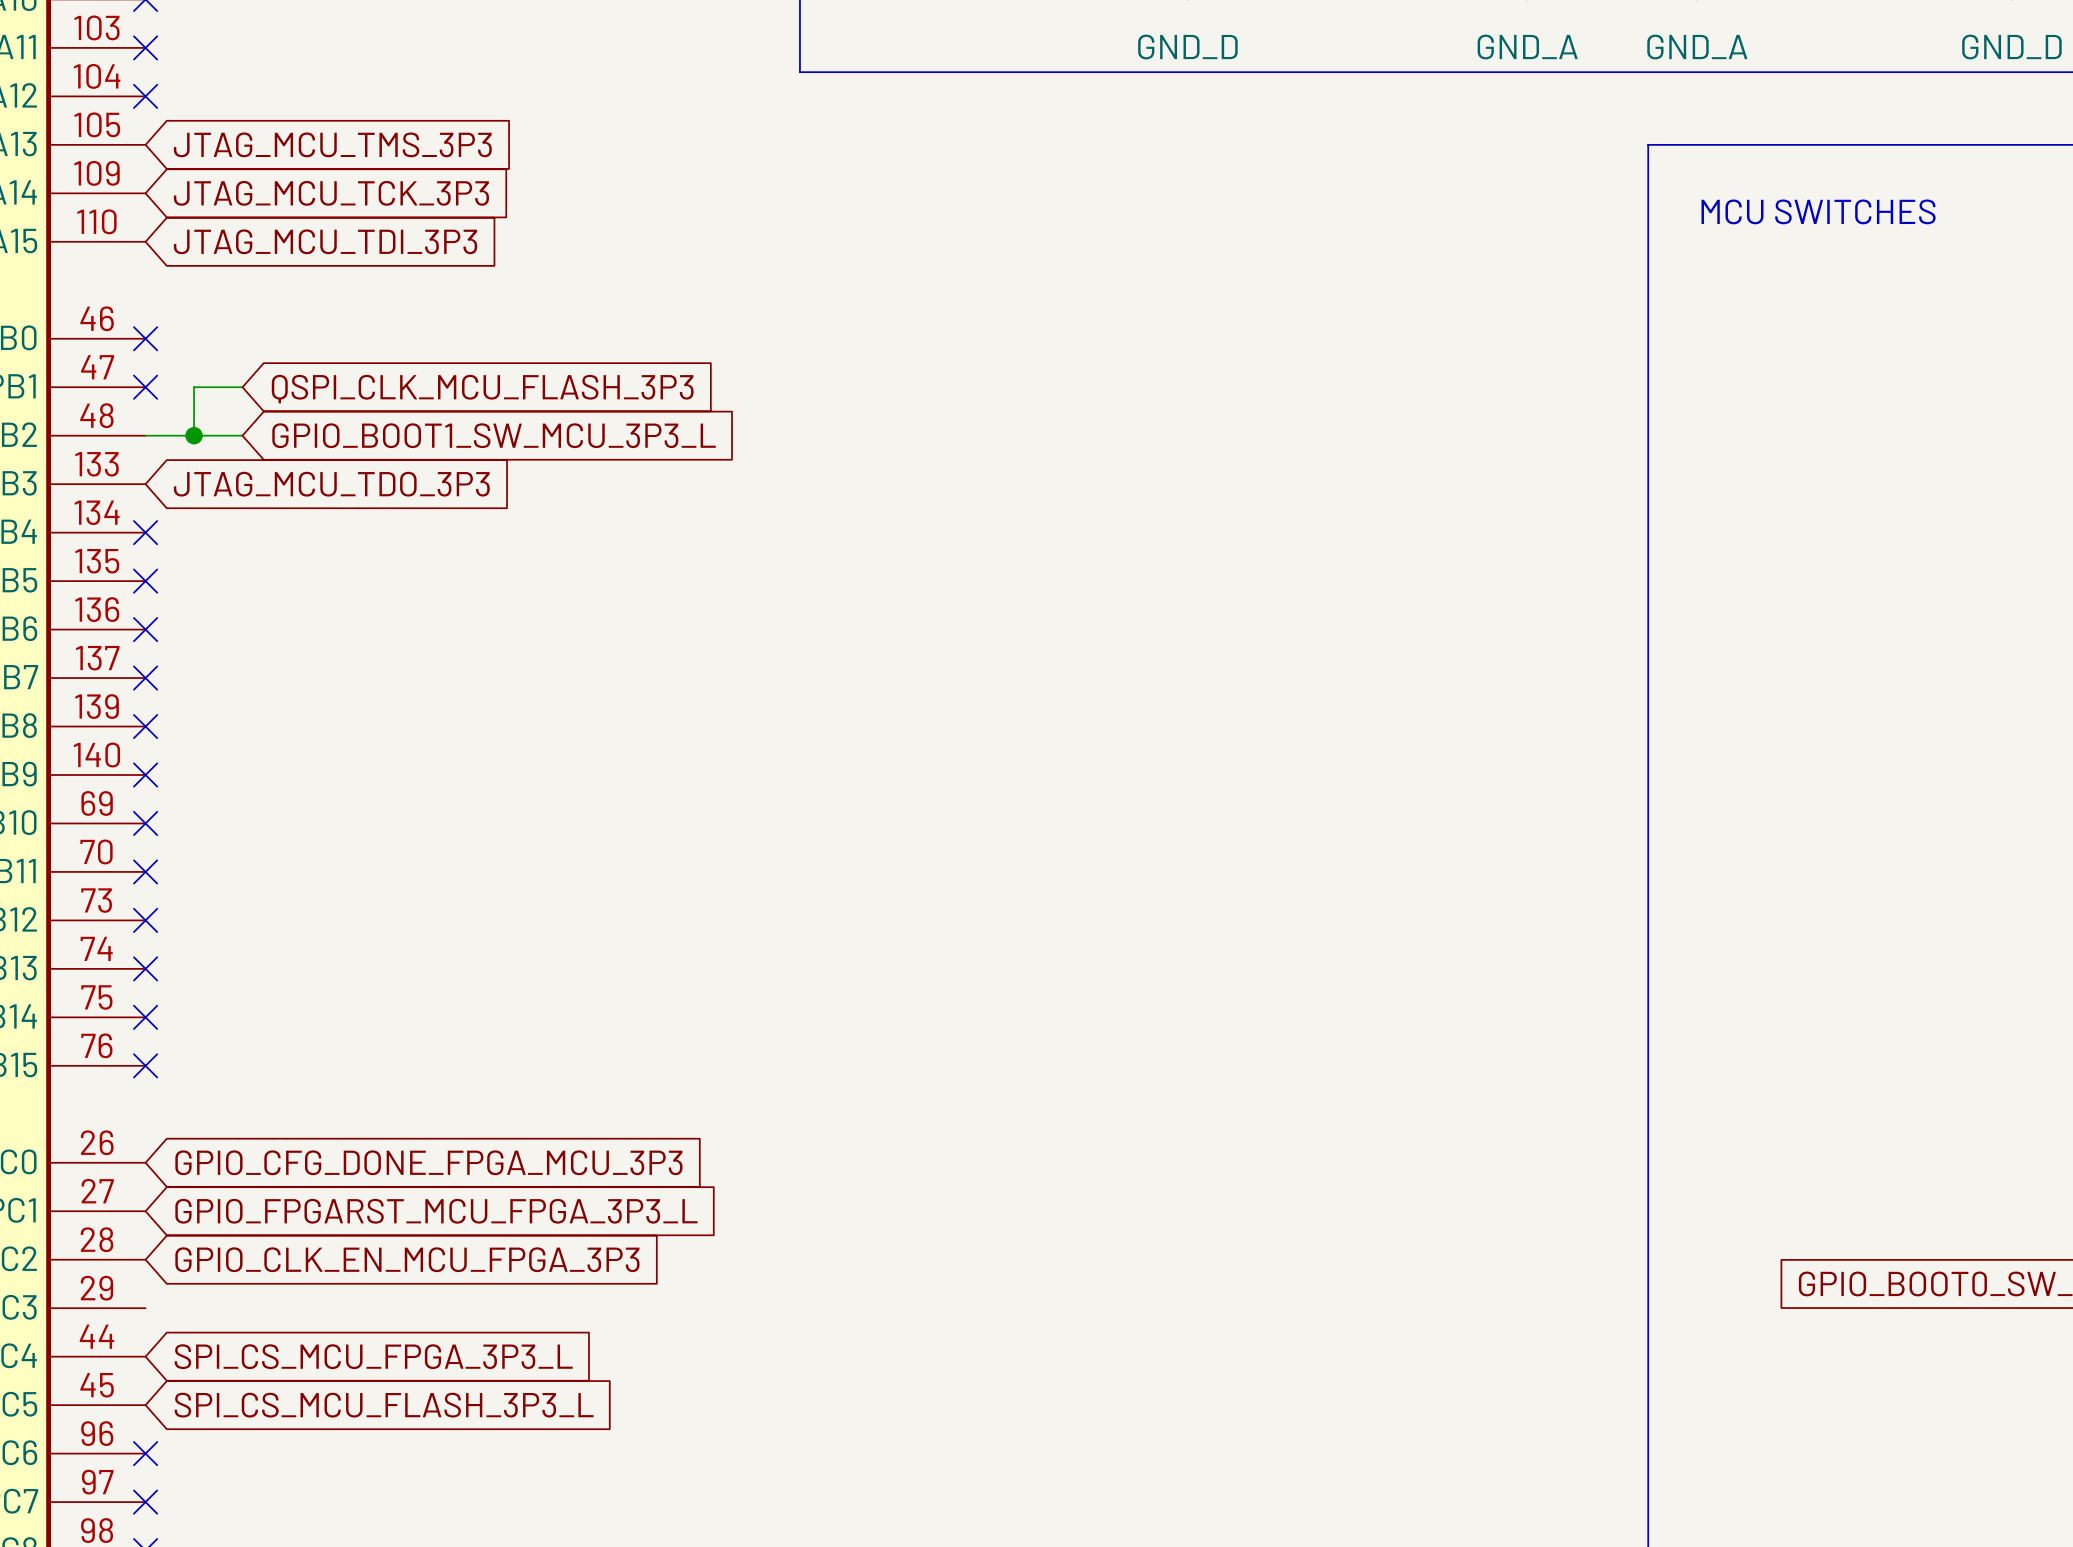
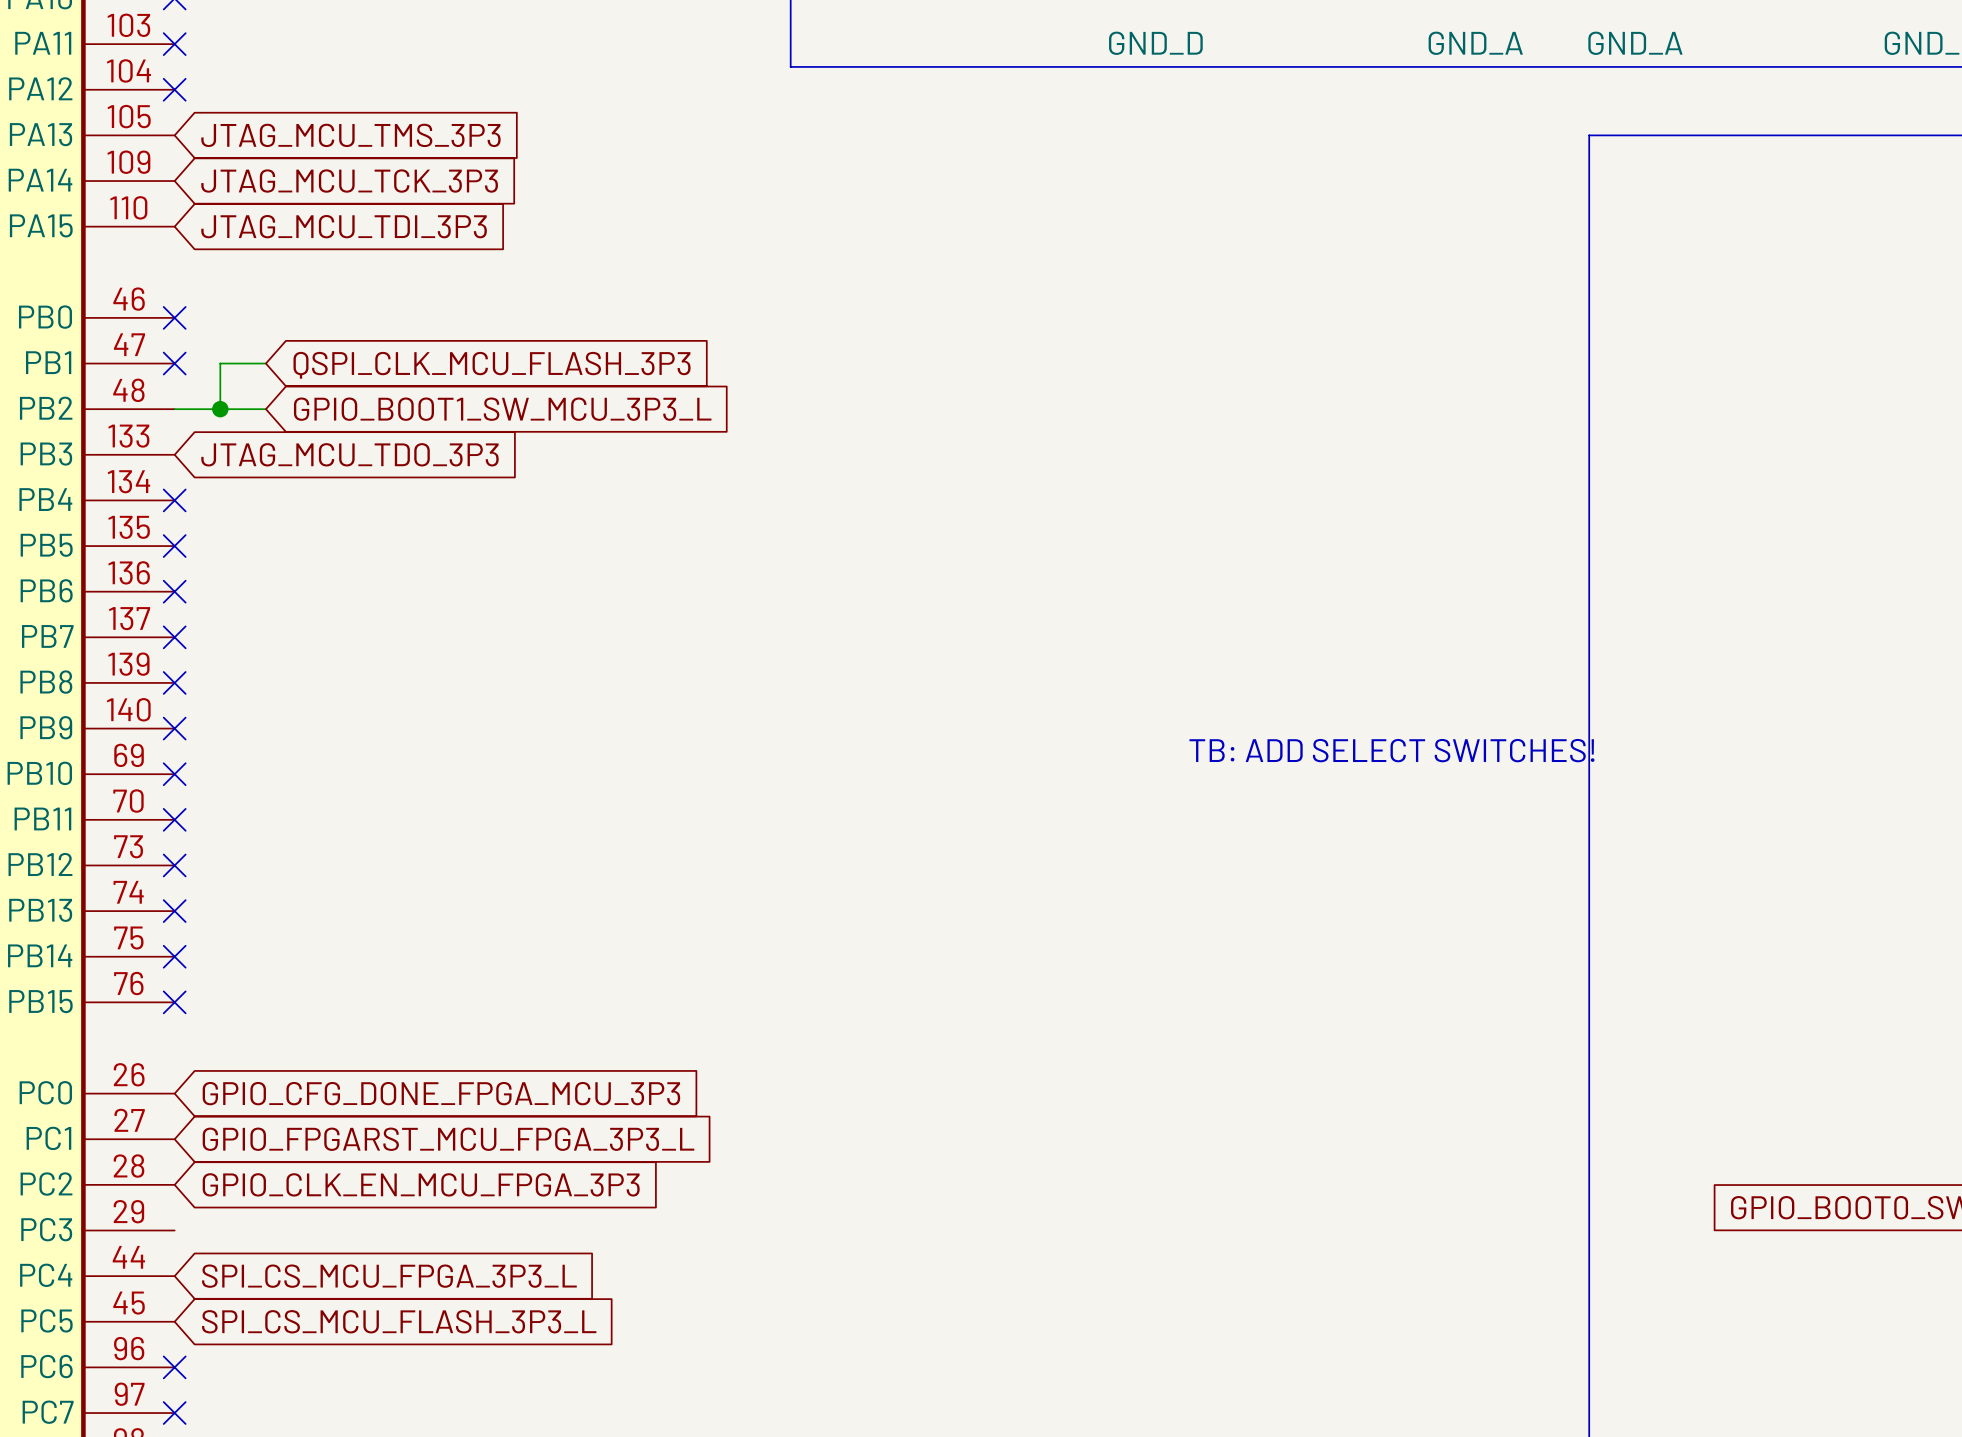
text: MCU SWITCHES (1818, 211) -> none
text: none -> TB: ADD SELECT SWITCHES! (1391, 750)

